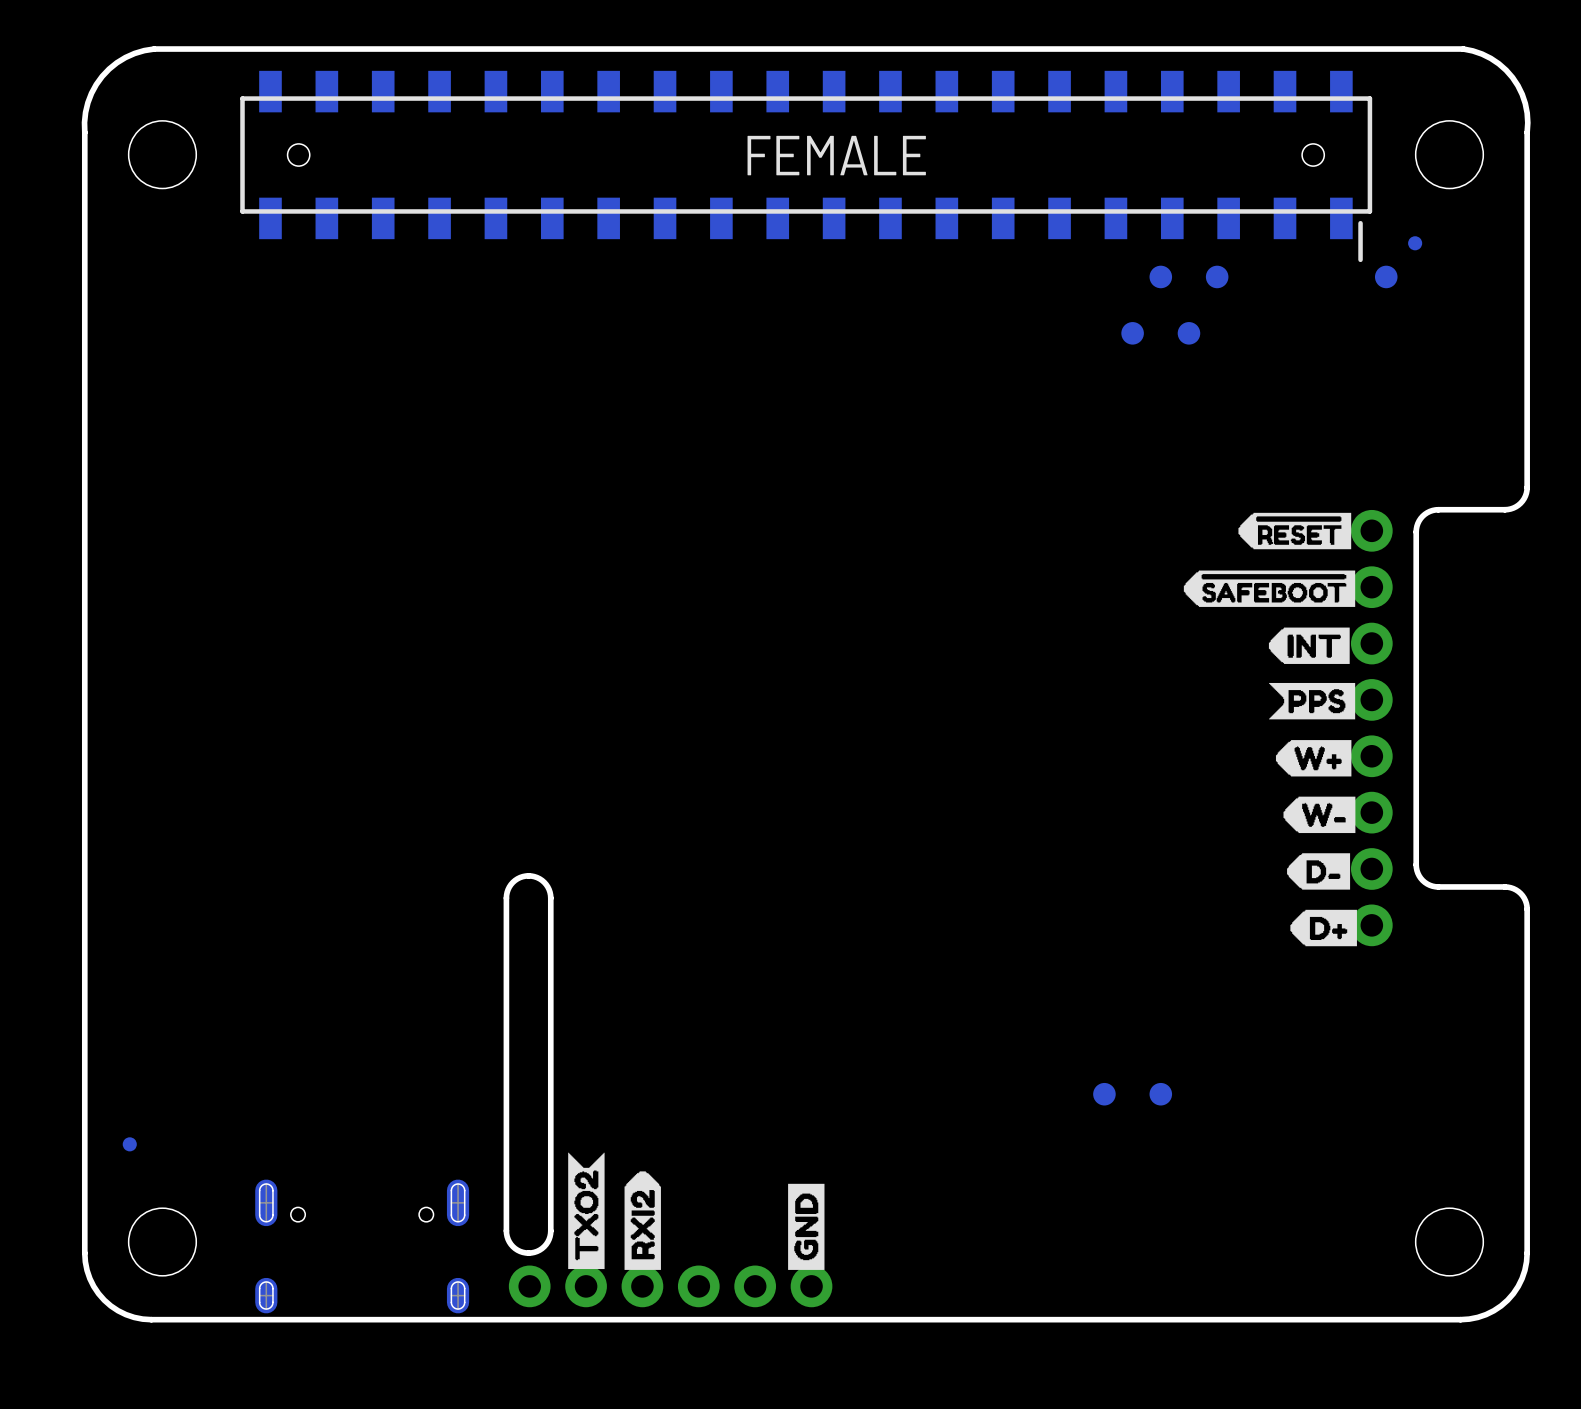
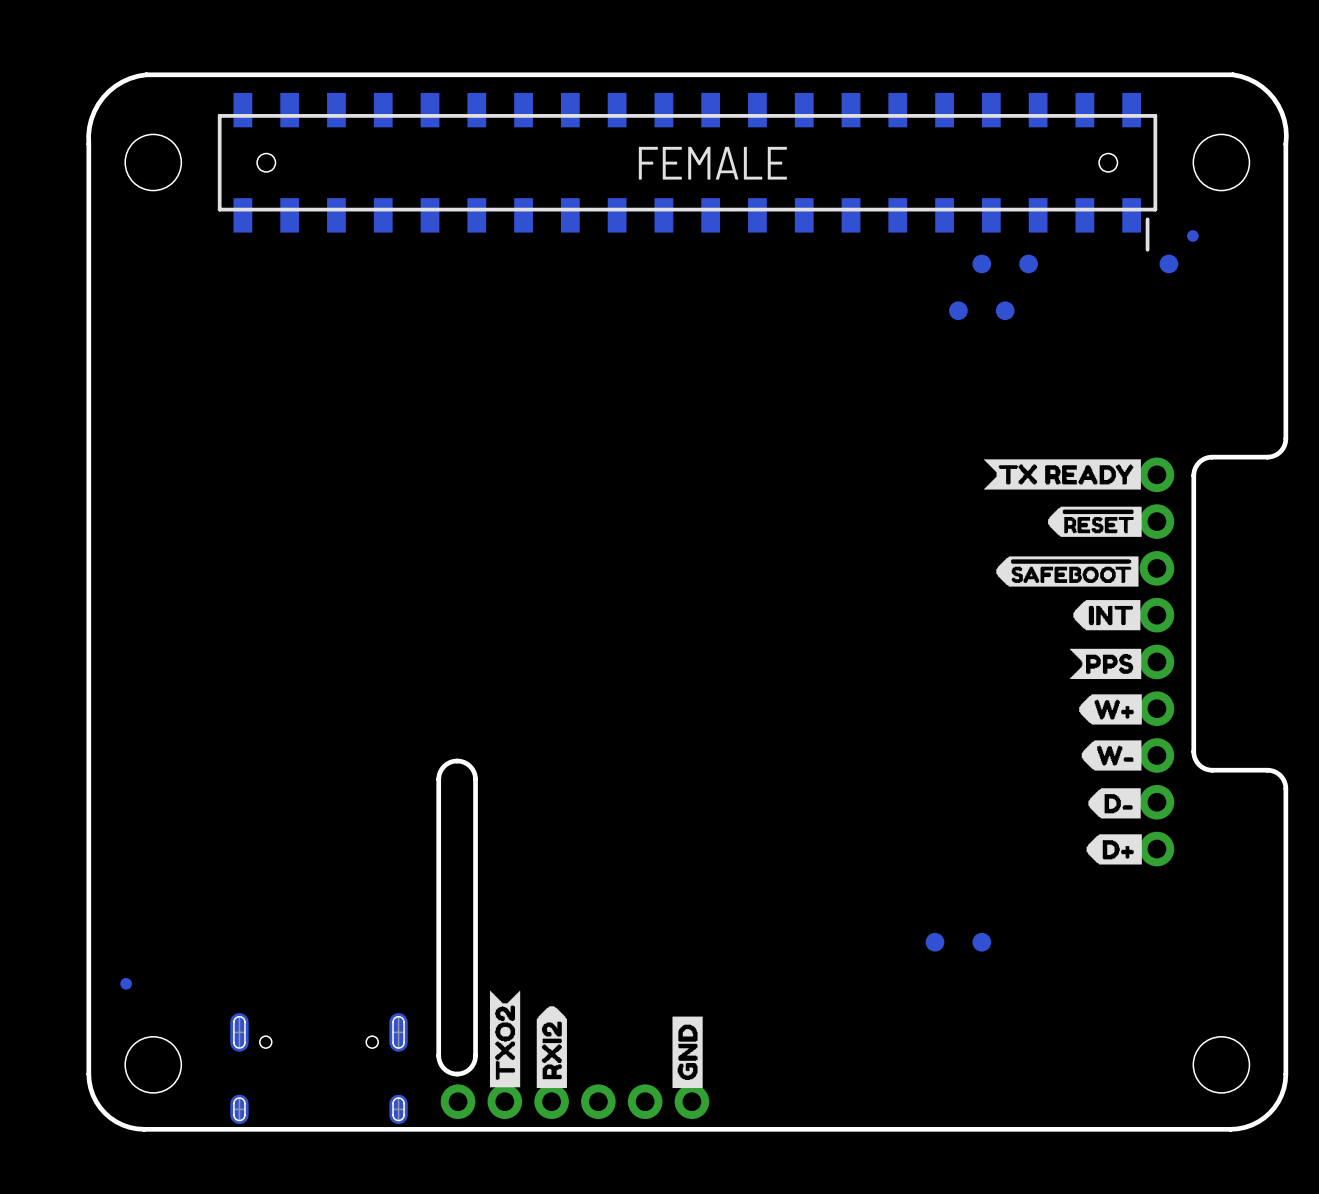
drawing: none -> [984, 459, 1141, 490]
drawing position: (1294, 531) -> (1094, 521)
drawing position: (1269, 588) -> (1067, 571)
drawing position: (1309, 645) -> (1106, 615)
drawing position: (1312, 701) -> (1105, 663)
part: (1371, 728) -> none
part: none -> (1156, 661)
drawing position: (1313, 758) -> (1110, 709)
drawing position: (1319, 814) -> (1111, 755)
drawing position: (1318, 871) -> (1114, 803)
drawing position: (1323, 928) -> (1114, 849)

